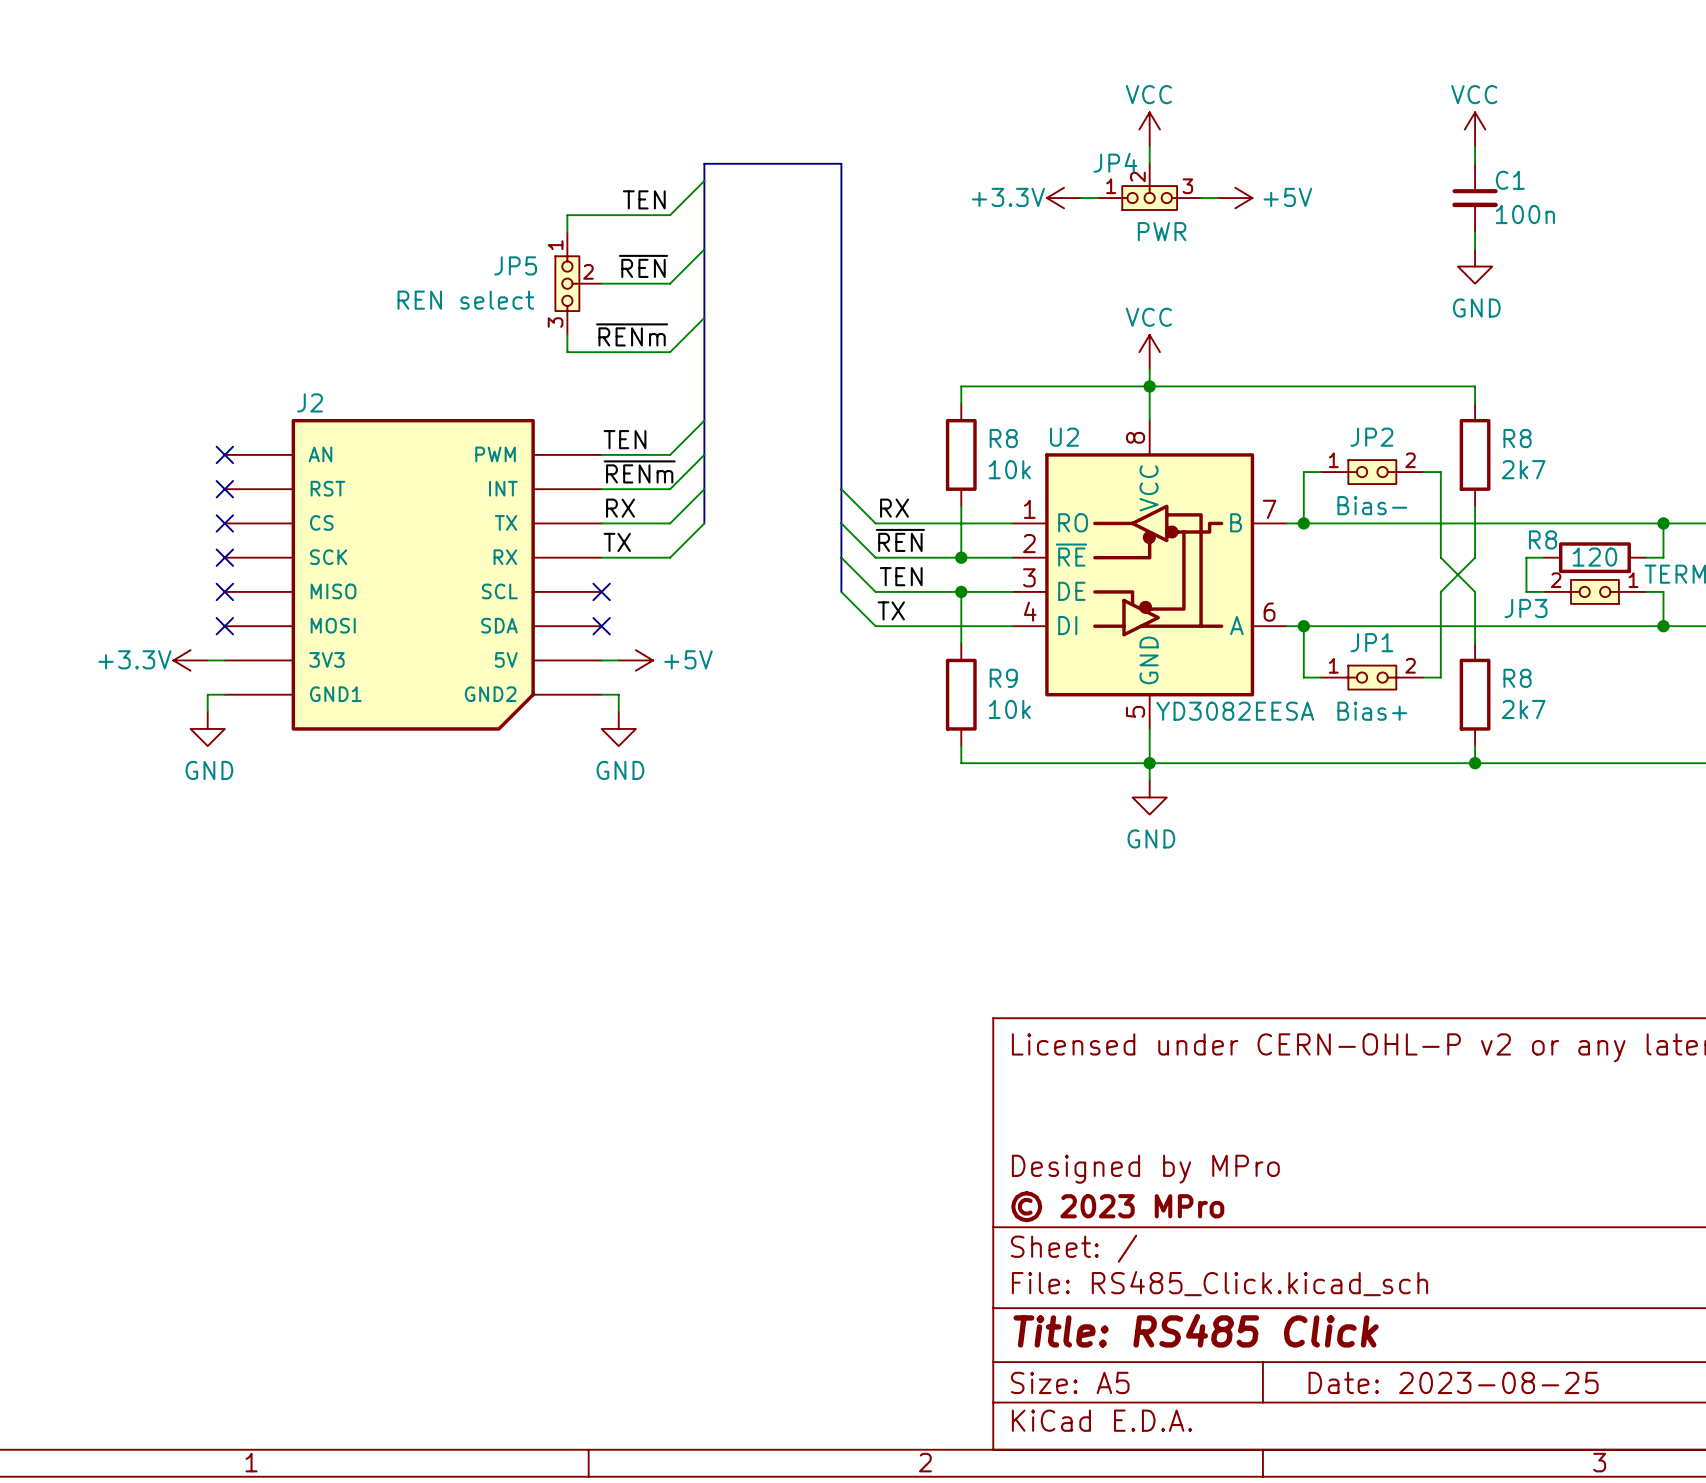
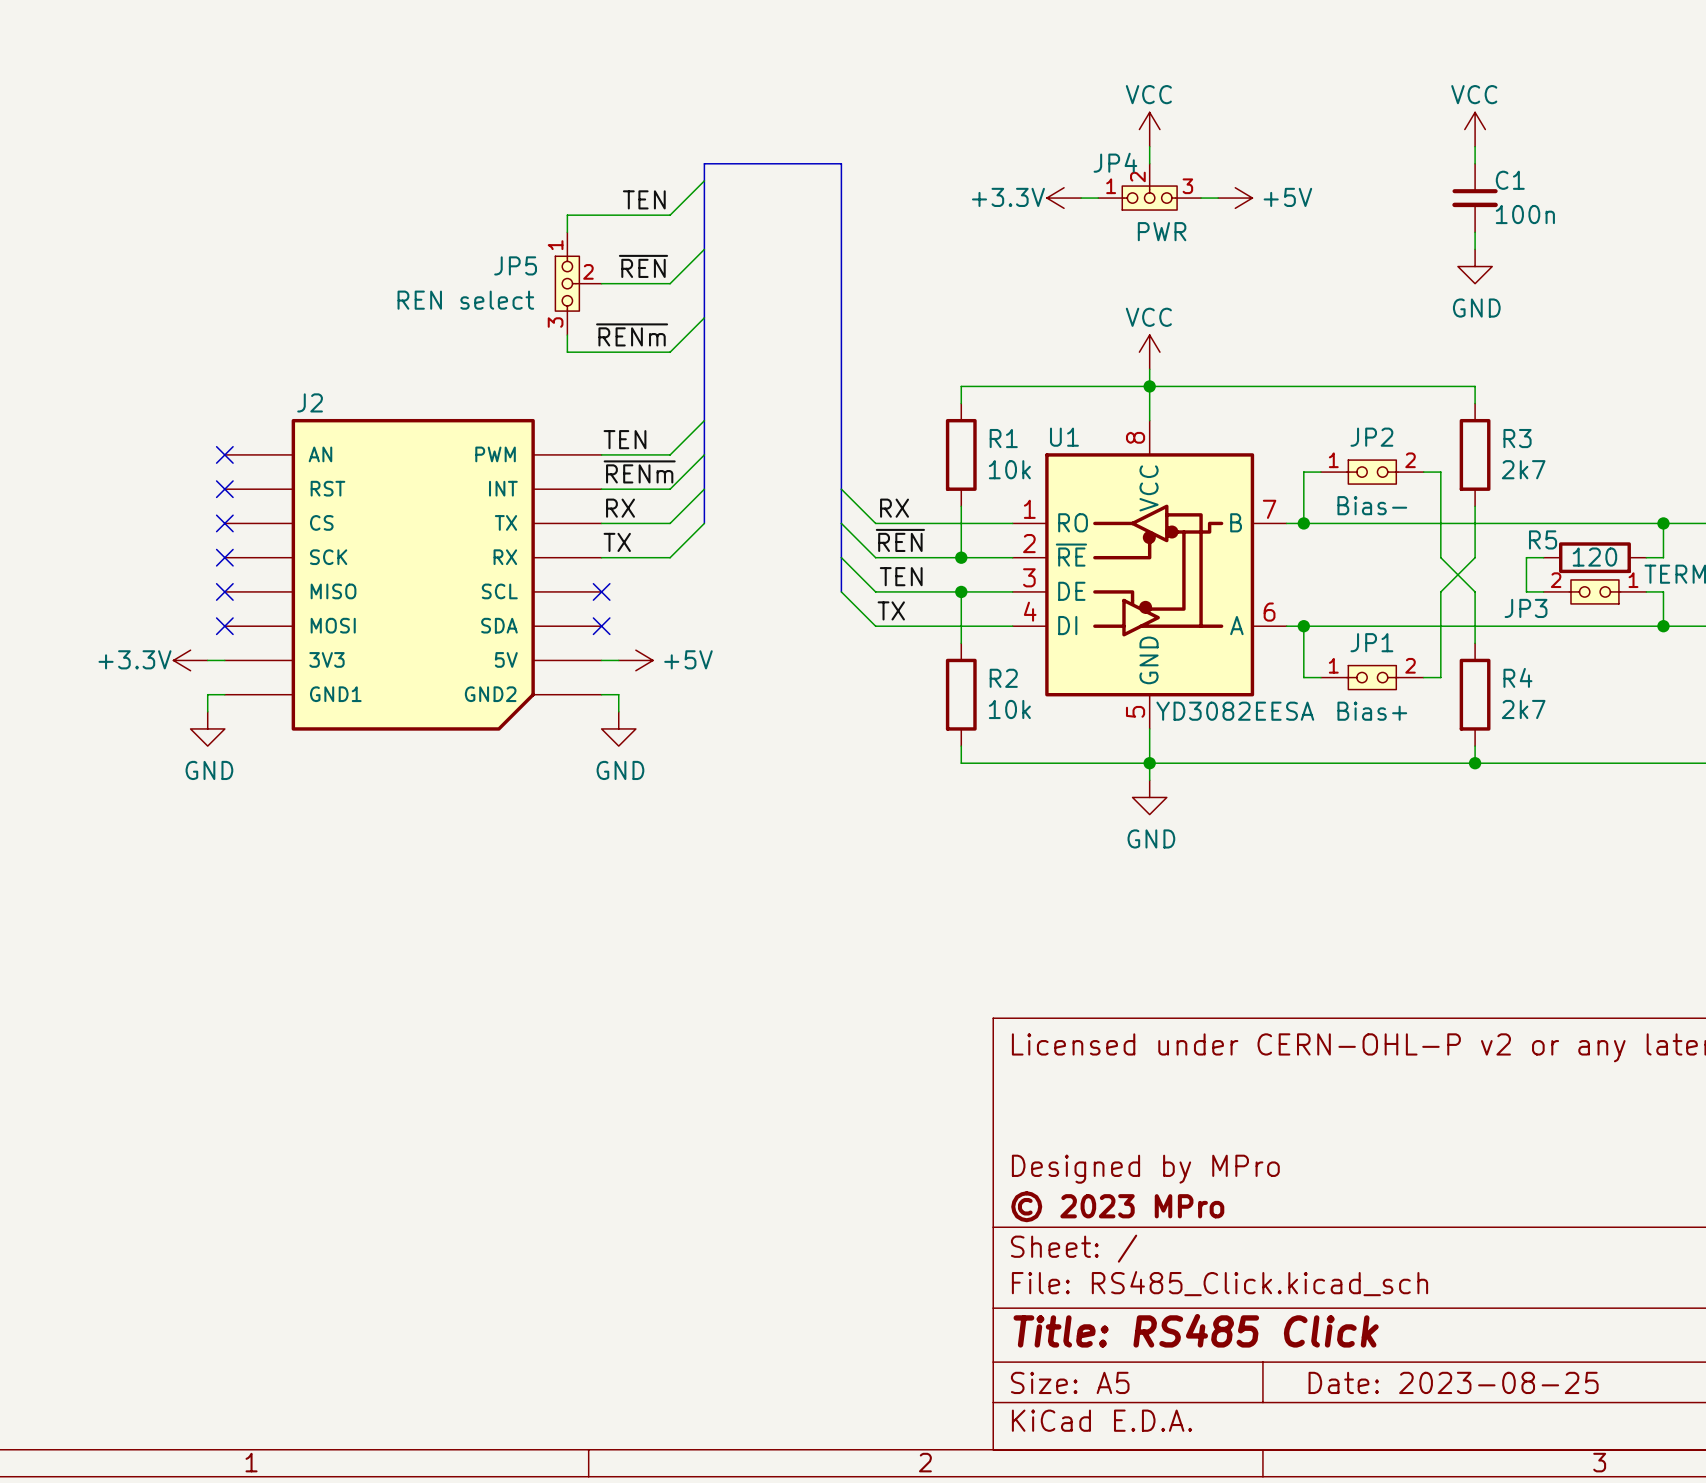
U2 name: U2 (1064, 437) -> U1 (1064, 437)
R8 name: R8 (1003, 438) -> R1 (1003, 438)
R8 name: R8 (1517, 438) -> R3 (1517, 438)
R8 name: R8 (1543, 539) -> R5 (1543, 539)
R9 name: R9 (1003, 678) -> R2 (1003, 678)
R8 name: R8 (1517, 678) -> R4 (1517, 677)

